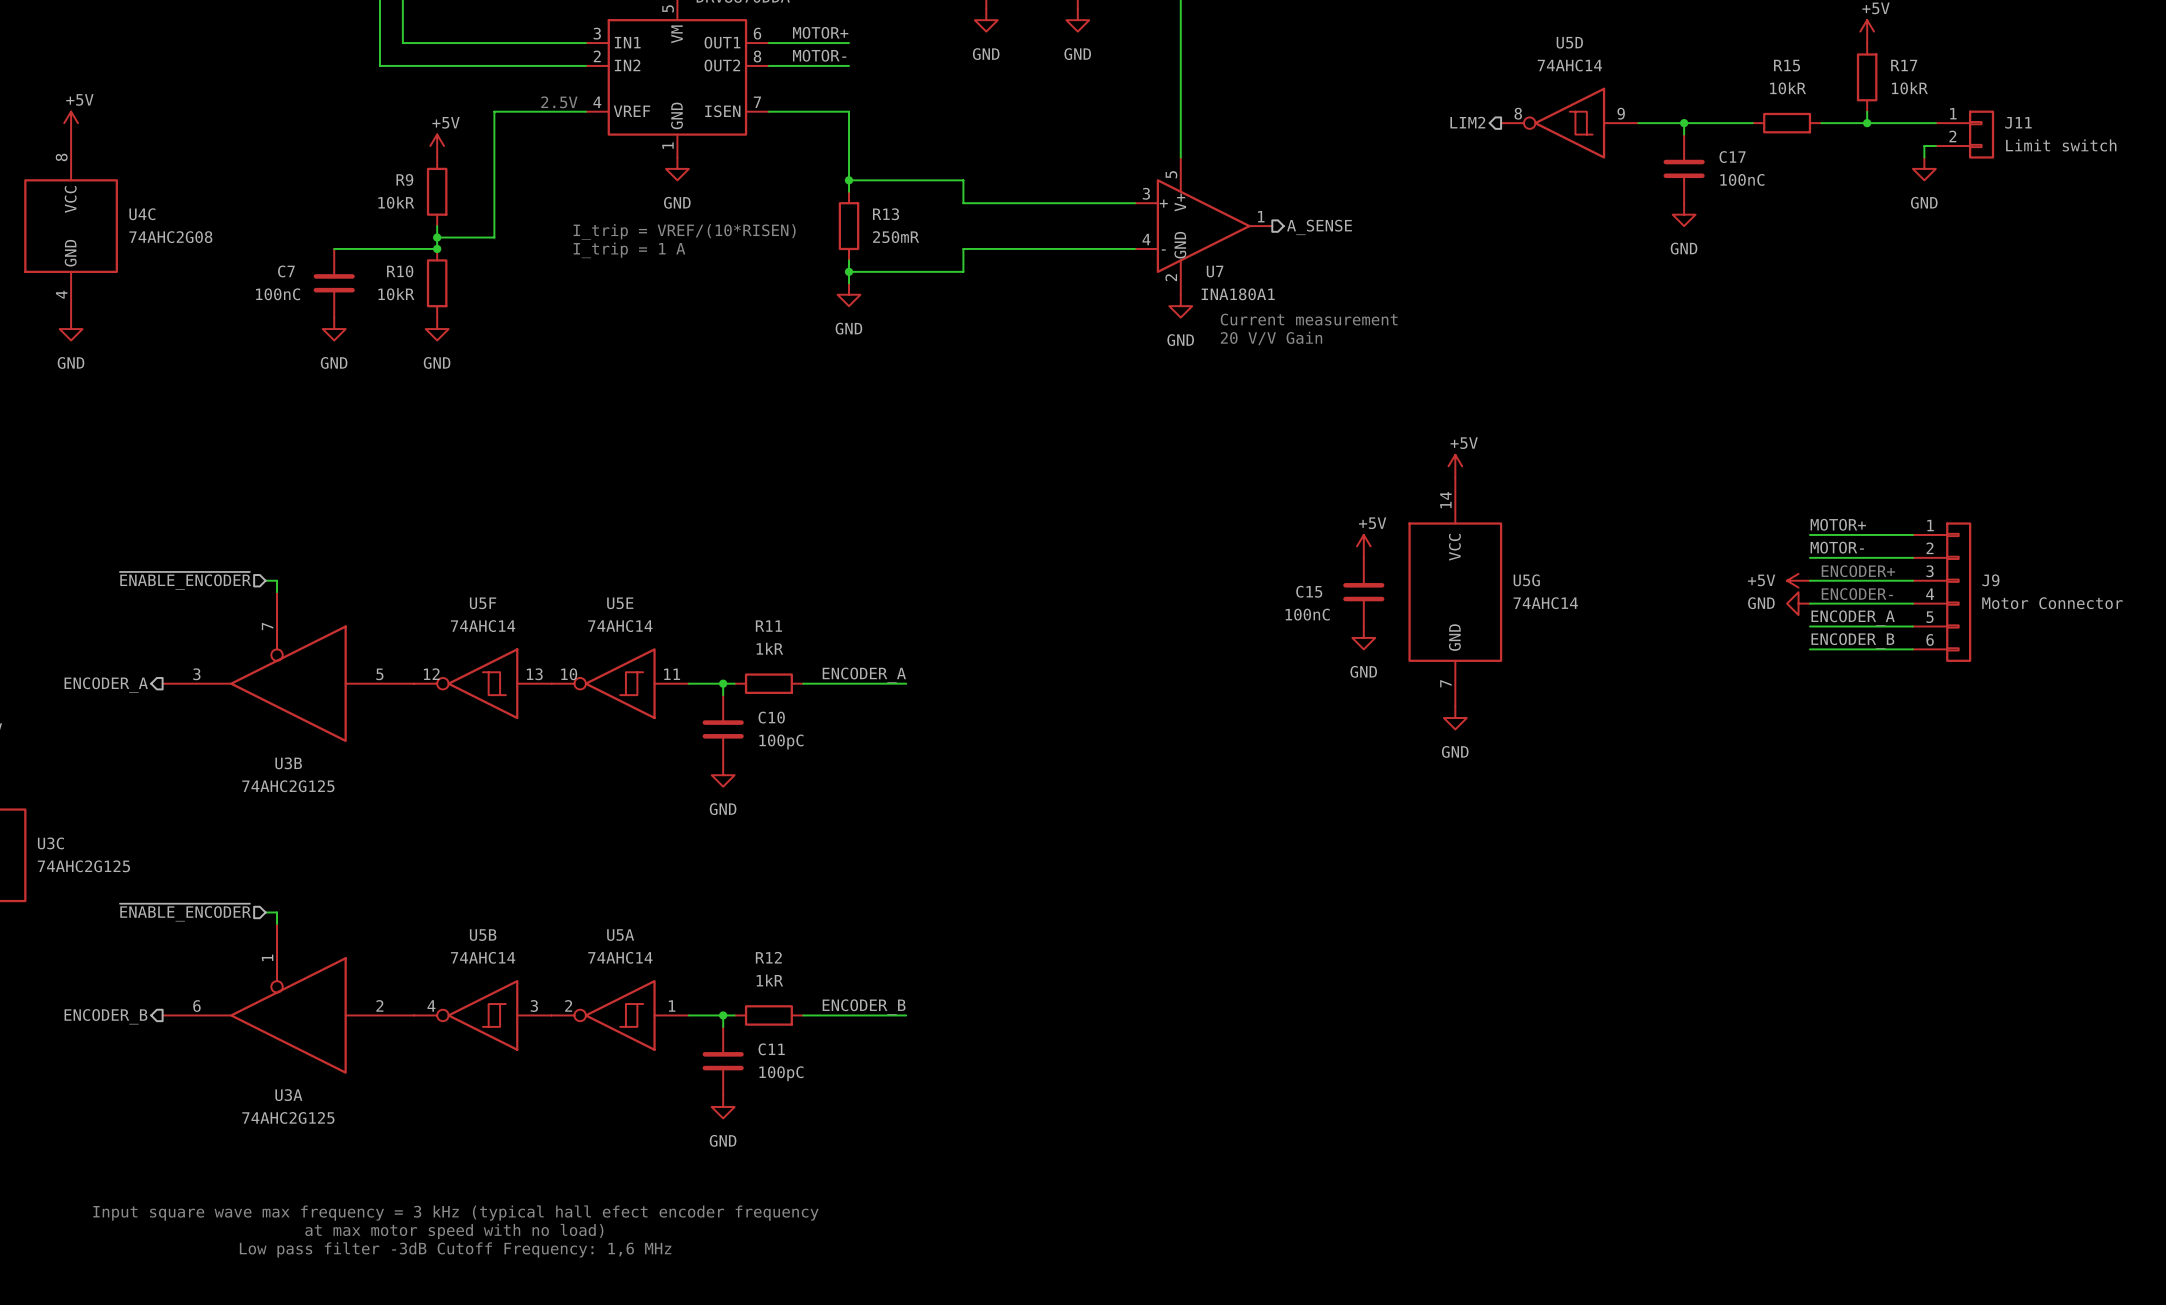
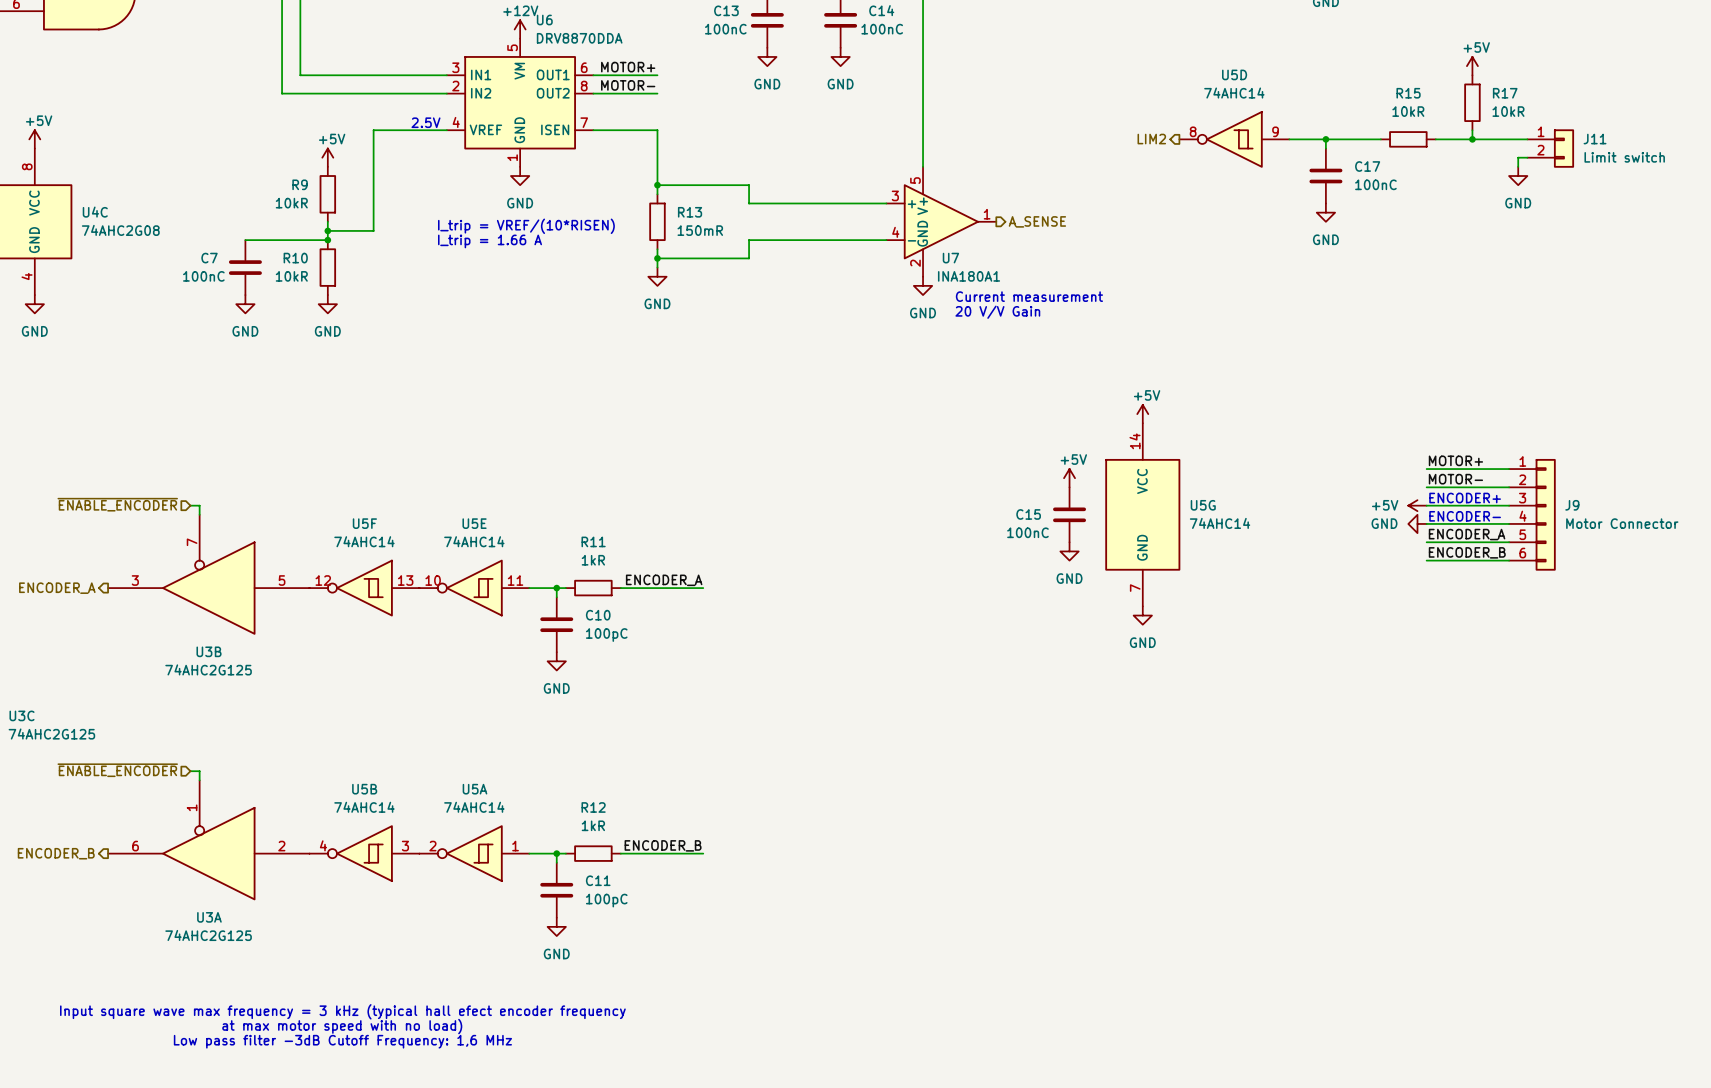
R13 value: 250mR (896, 237) -> 150mR (700, 230)
text: I_trip = 1 A (629, 250) -> I_trip = 1.66 A (490, 241)

